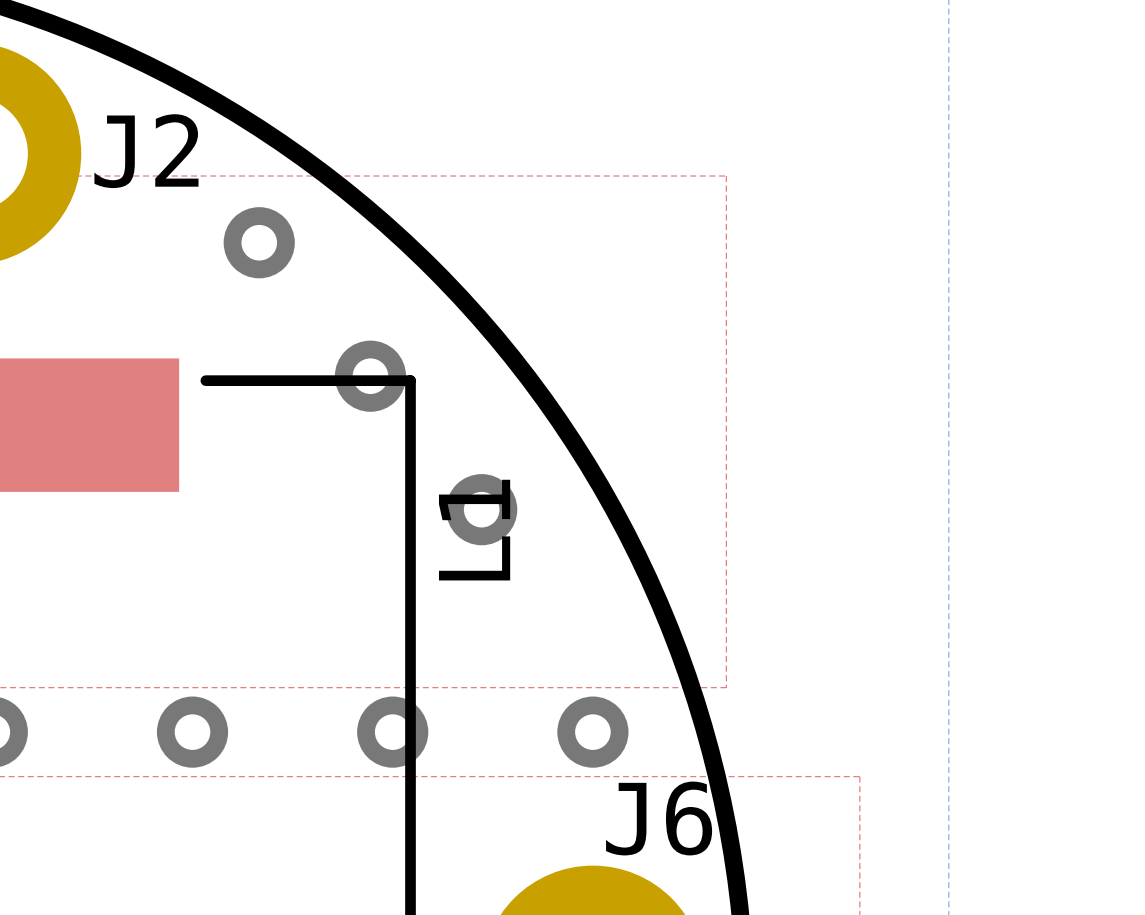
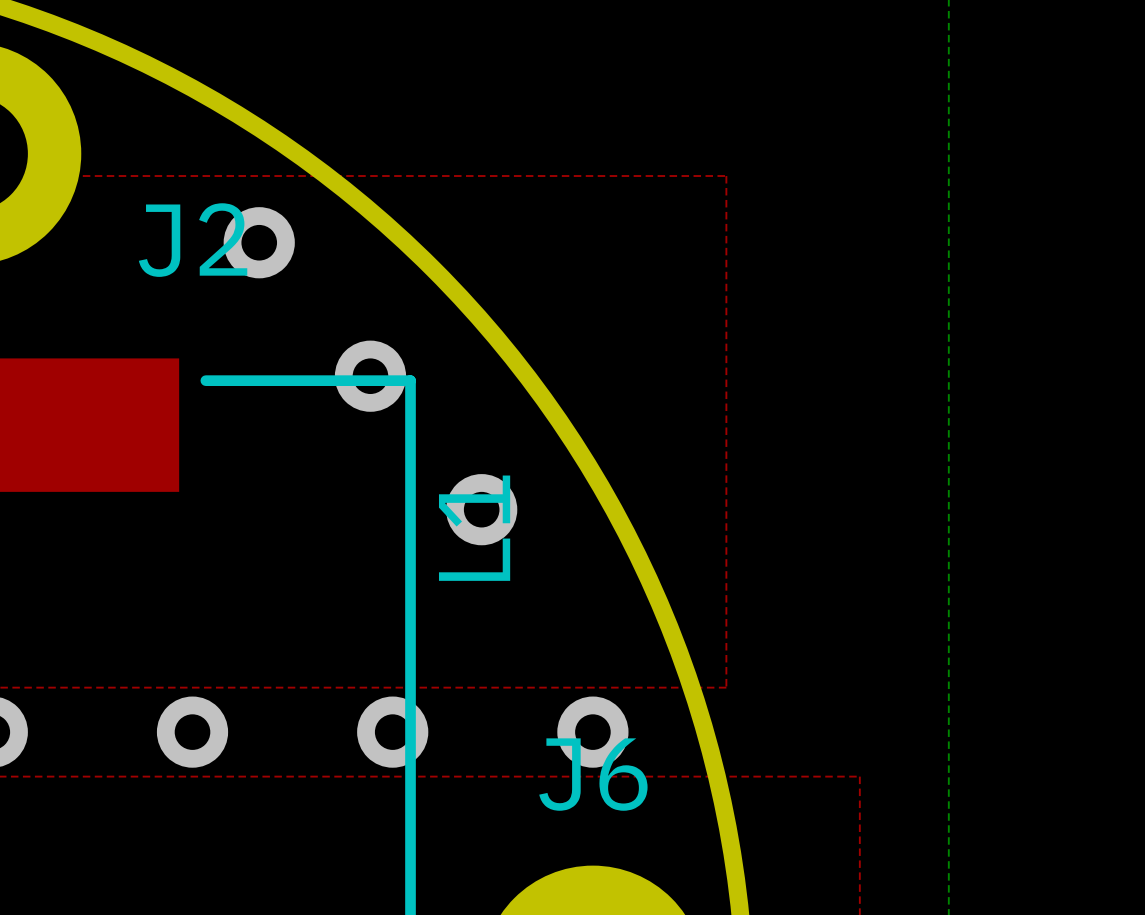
J2 name position: J2 (146, 151) -> J2 (193, 240)
J6 name position: J6 (659, 818) -> J6 (593, 774)

